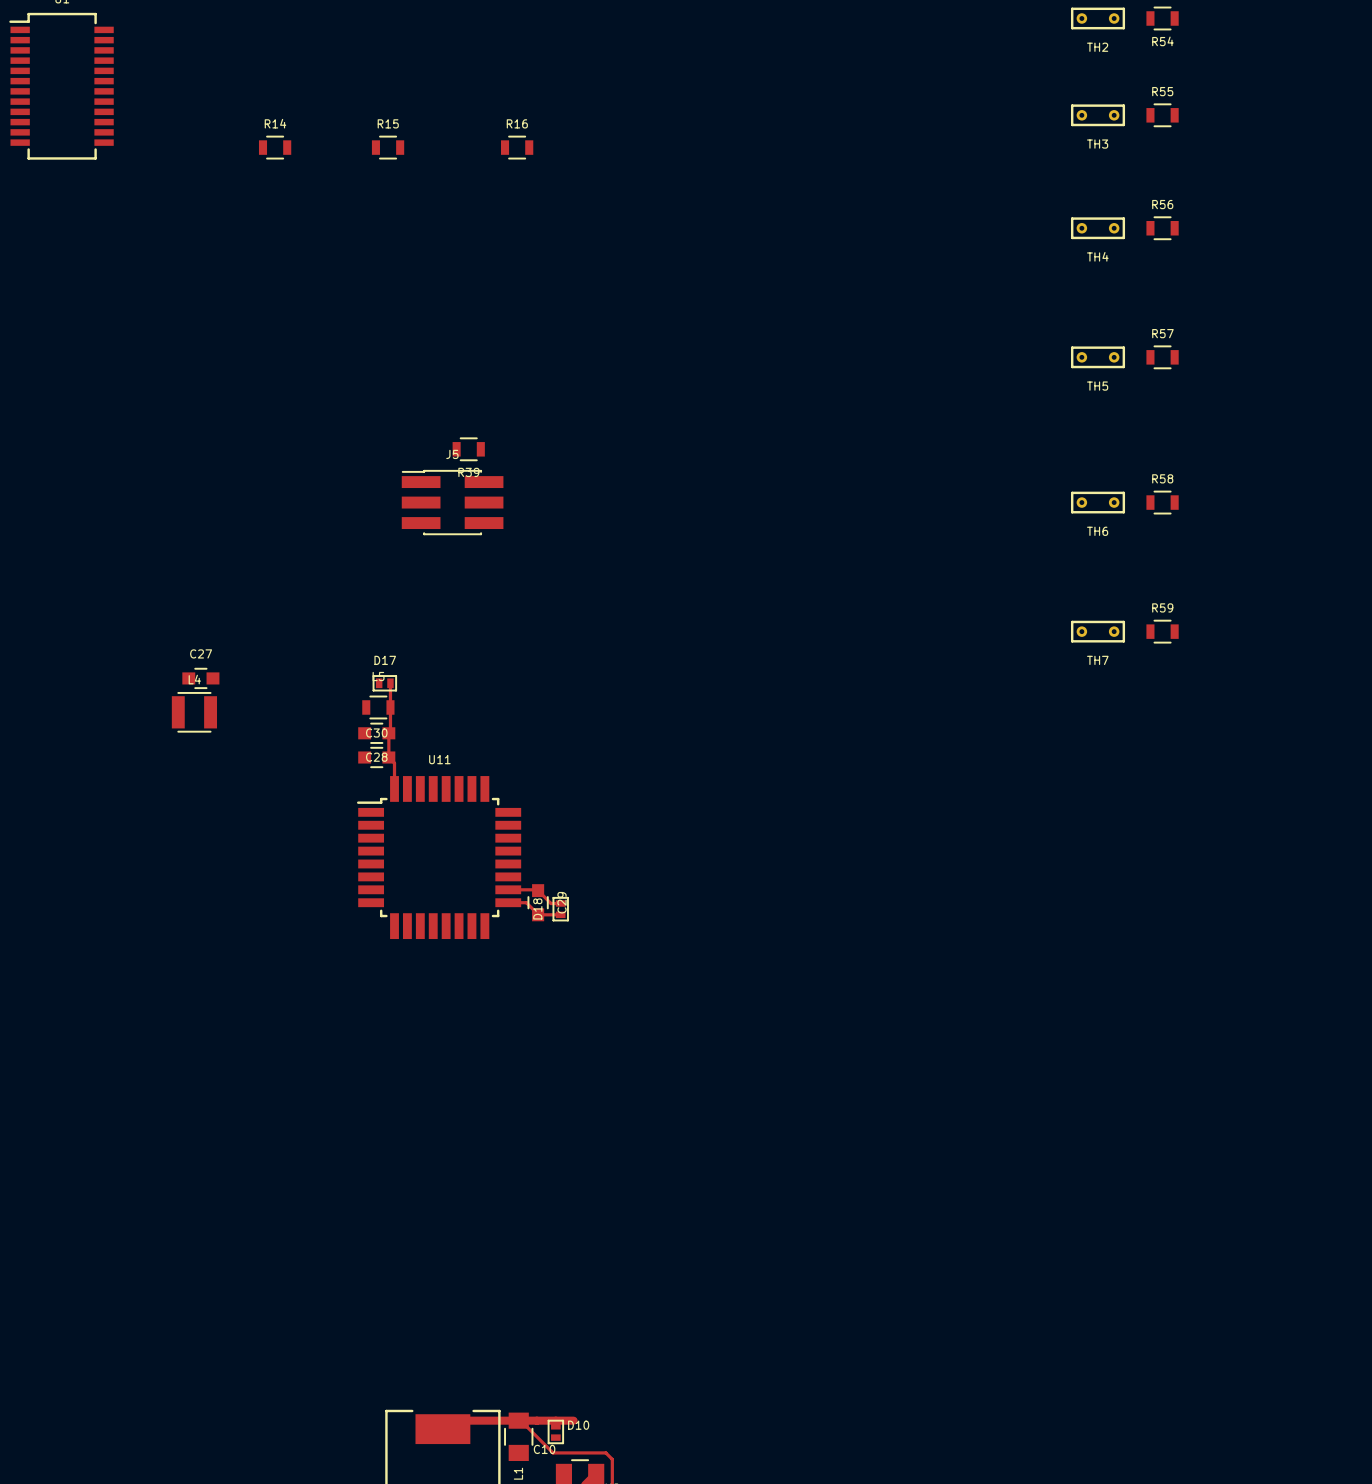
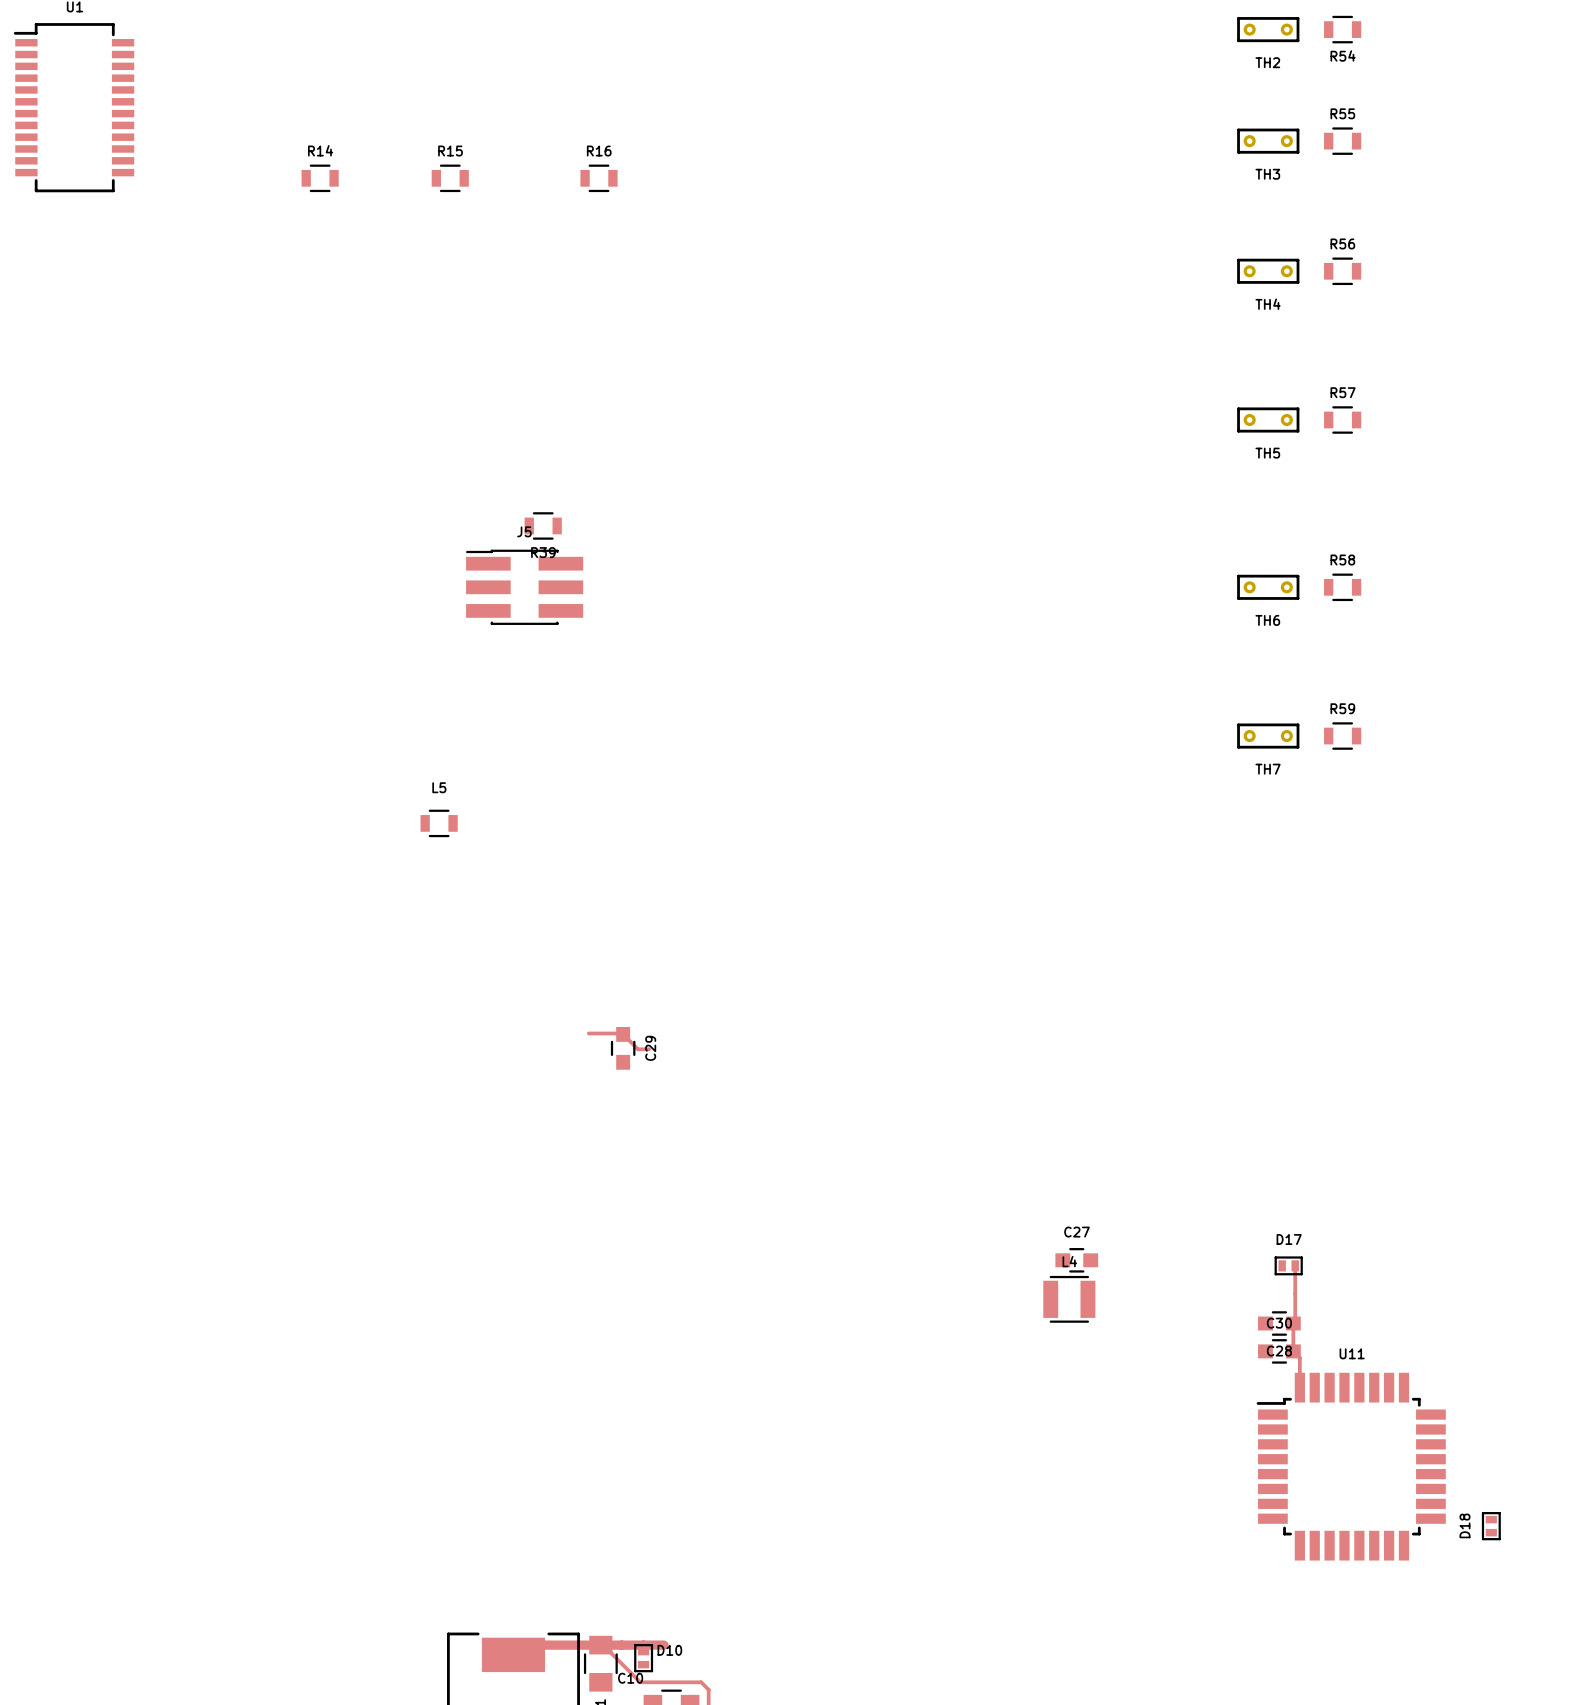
C27 position: (200, 678) -> (1076, 1260)
D17 position: (384, 683) -> (1288, 1265)
track: (390, 683) (388, 757) (394, 763) (394, 788) -> none
L4 position: (194, 712) -> (1069, 1299)
C28 position: (376, 733) -> (1279, 1323)
C30 position: (376, 757) -> (1279, 1351)
U11 position: (439, 857) -> (1351, 1466)
track: (508, 902) (526, 902) (538, 914) (560, 914) -> none
D18 position: (560, 909) -> (1491, 1526)
track: none -> (1295, 1265) (1293, 1351) (1299, 1357) (1299, 1387)

